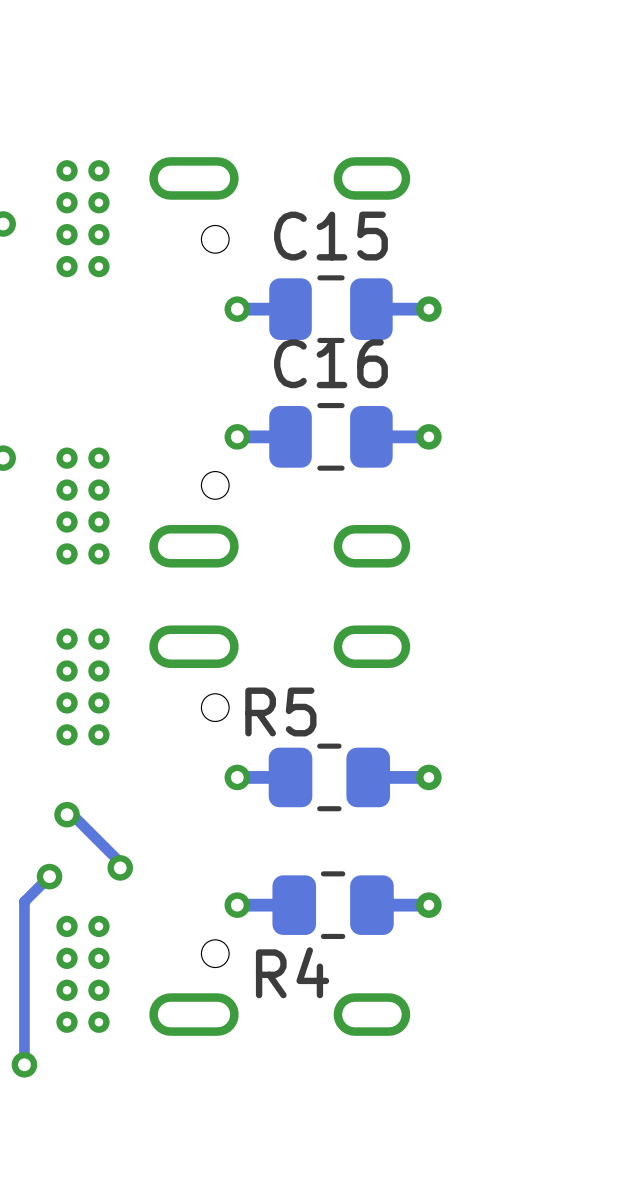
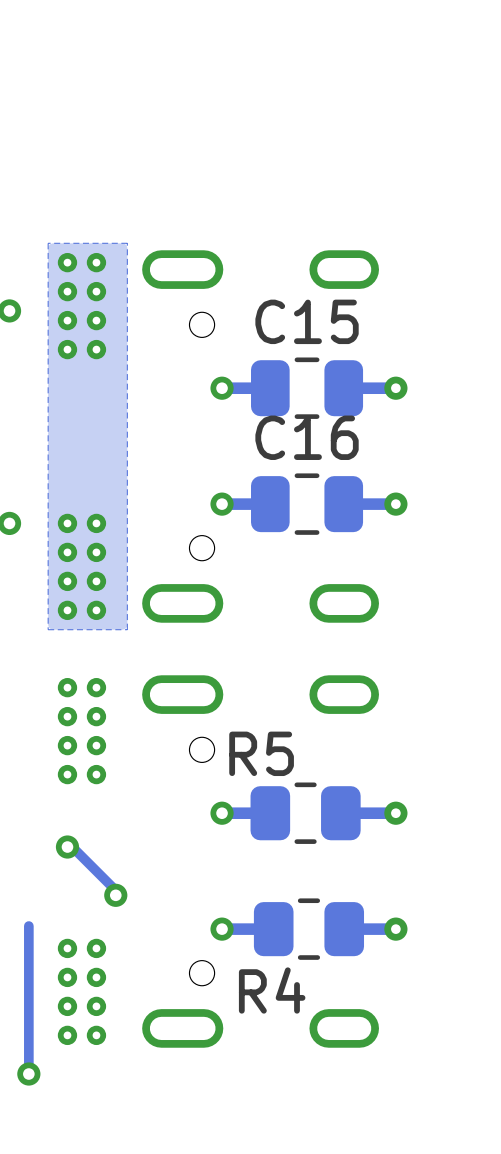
zone outline: none -> (127, 243) (48, 243) (48, 629) (127, 629) (127, 243)
track: (49, 876) (24, 901) -> none
via: (49, 876) -> none

